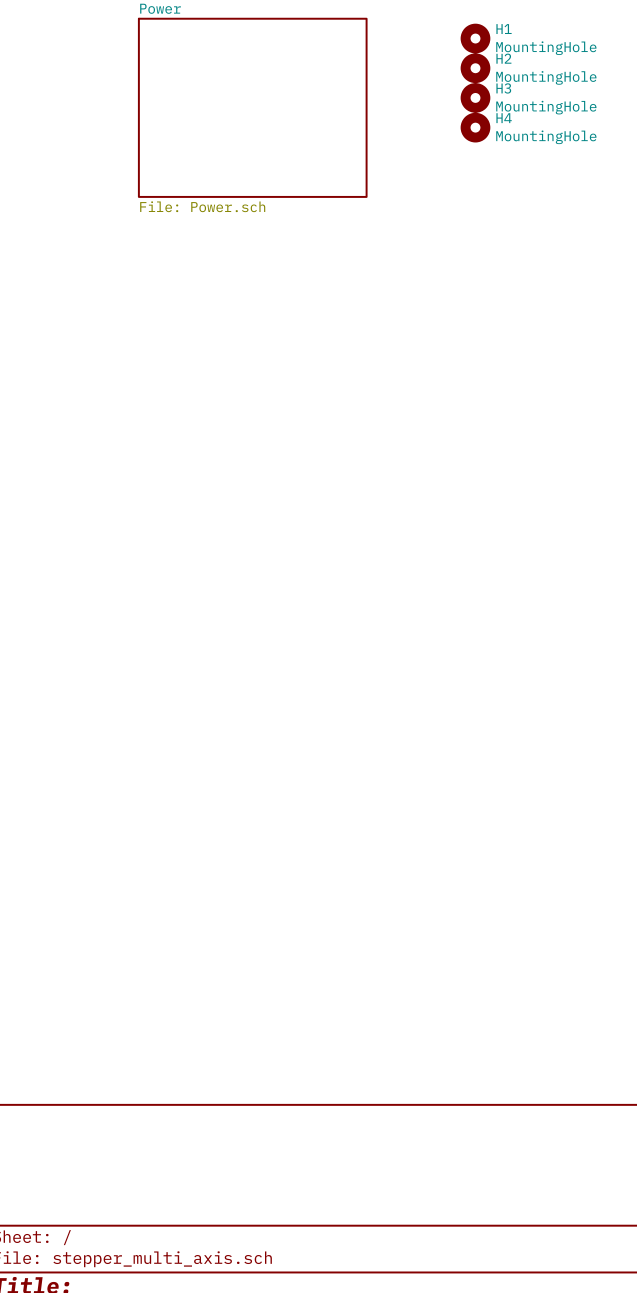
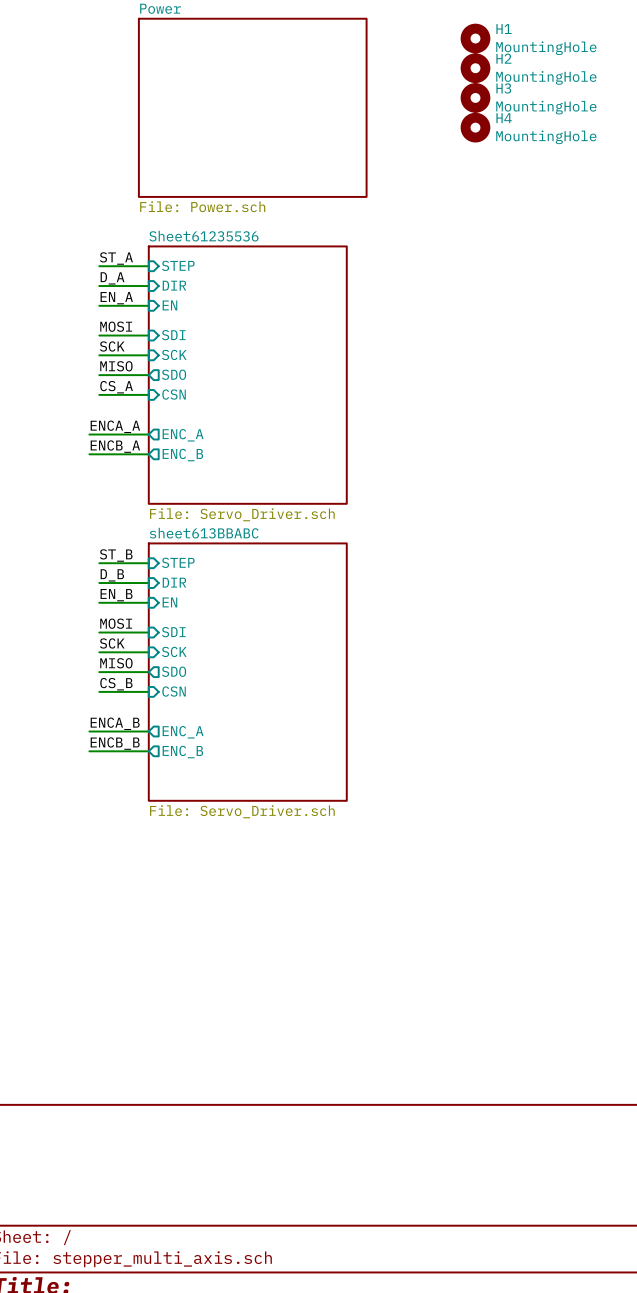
label: none -> ST_A (116, 258)
sheet pin: none -> STEP (178, 265)
wire: none -> (99, 266) (148, 266)
label: none -> D_A (112, 278)
sheet pin: none -> DIR (174, 285)
wire: none -> (99, 286) (148, 286)
label: none -> EN_A (116, 298)
wire: none -> (99, 305) (148, 305)
sheet pin: none -> EN (169, 305)
label: none -> MOSI (116, 326)
wire: none -> (99, 335) (148, 335)
sheet pin: none -> SDI (173, 335)
label: none -> SCK (112, 346)
sheet pin: none -> SCK (174, 354)
wire: none -> (99, 355) (148, 355)
label: none -> MISO (116, 366)
sheet pin: none -> SDO (174, 374)
wire: none -> (99, 375) (148, 375)
sheet Sheet61235536: none -> File: Servo_Driver.sch (247, 375)
label: none -> CS_A (116, 387)
wire: none -> (99, 394) (148, 394)
sheet pin: none -> CSN (174, 394)
label: none -> ENCA_A (115, 426)
wire: none -> (89, 434) (148, 434)
sheet pin: none -> ENC_A (183, 435)
label: none -> ENCB_A (115, 446)
wire: none -> (89, 454) (148, 454)
sheet pin: none -> ENC_B (182, 455)
label: none -> ST_B (116, 555)
sheet pin: none -> STEP (178, 562)
wire: none -> (99, 563) (148, 563)
label: none -> D_B (112, 575)
sheet pin: none -> DIR (174, 582)
wire: none -> (99, 583) (148, 583)
label: none -> EN_B (116, 595)
wire: none -> (99, 602) (148, 602)
sheet pin: none -> EN (169, 602)
label: none -> MOSI (116, 623)
wire: none -> (99, 632) (148, 632)
sheet pin: none -> SDI (173, 632)
label: none -> SCK (112, 643)
sheet pin: none -> SCK (174, 651)
wire: none -> (99, 652) (148, 652)
label: none -> MISO (116, 663)
sheet pin: none -> SDO (174, 671)
wire: none -> (99, 672) (148, 672)
sheet sheet613BBABC: none -> File: Servo_Driver.sch (247, 672)
label: none -> CS_B (116, 684)
wire: none -> (99, 691) (148, 691)
sheet pin: none -> CSN (174, 691)
label: none -> ENCA_B (115, 723)
wire: none -> (89, 731) (148, 731)
sheet pin: none -> ENC_A (183, 732)
label: none -> ENCB_B (115, 743)
wire: none -> (89, 751) (148, 751)
sheet pin: none -> ENC_B (182, 752)

